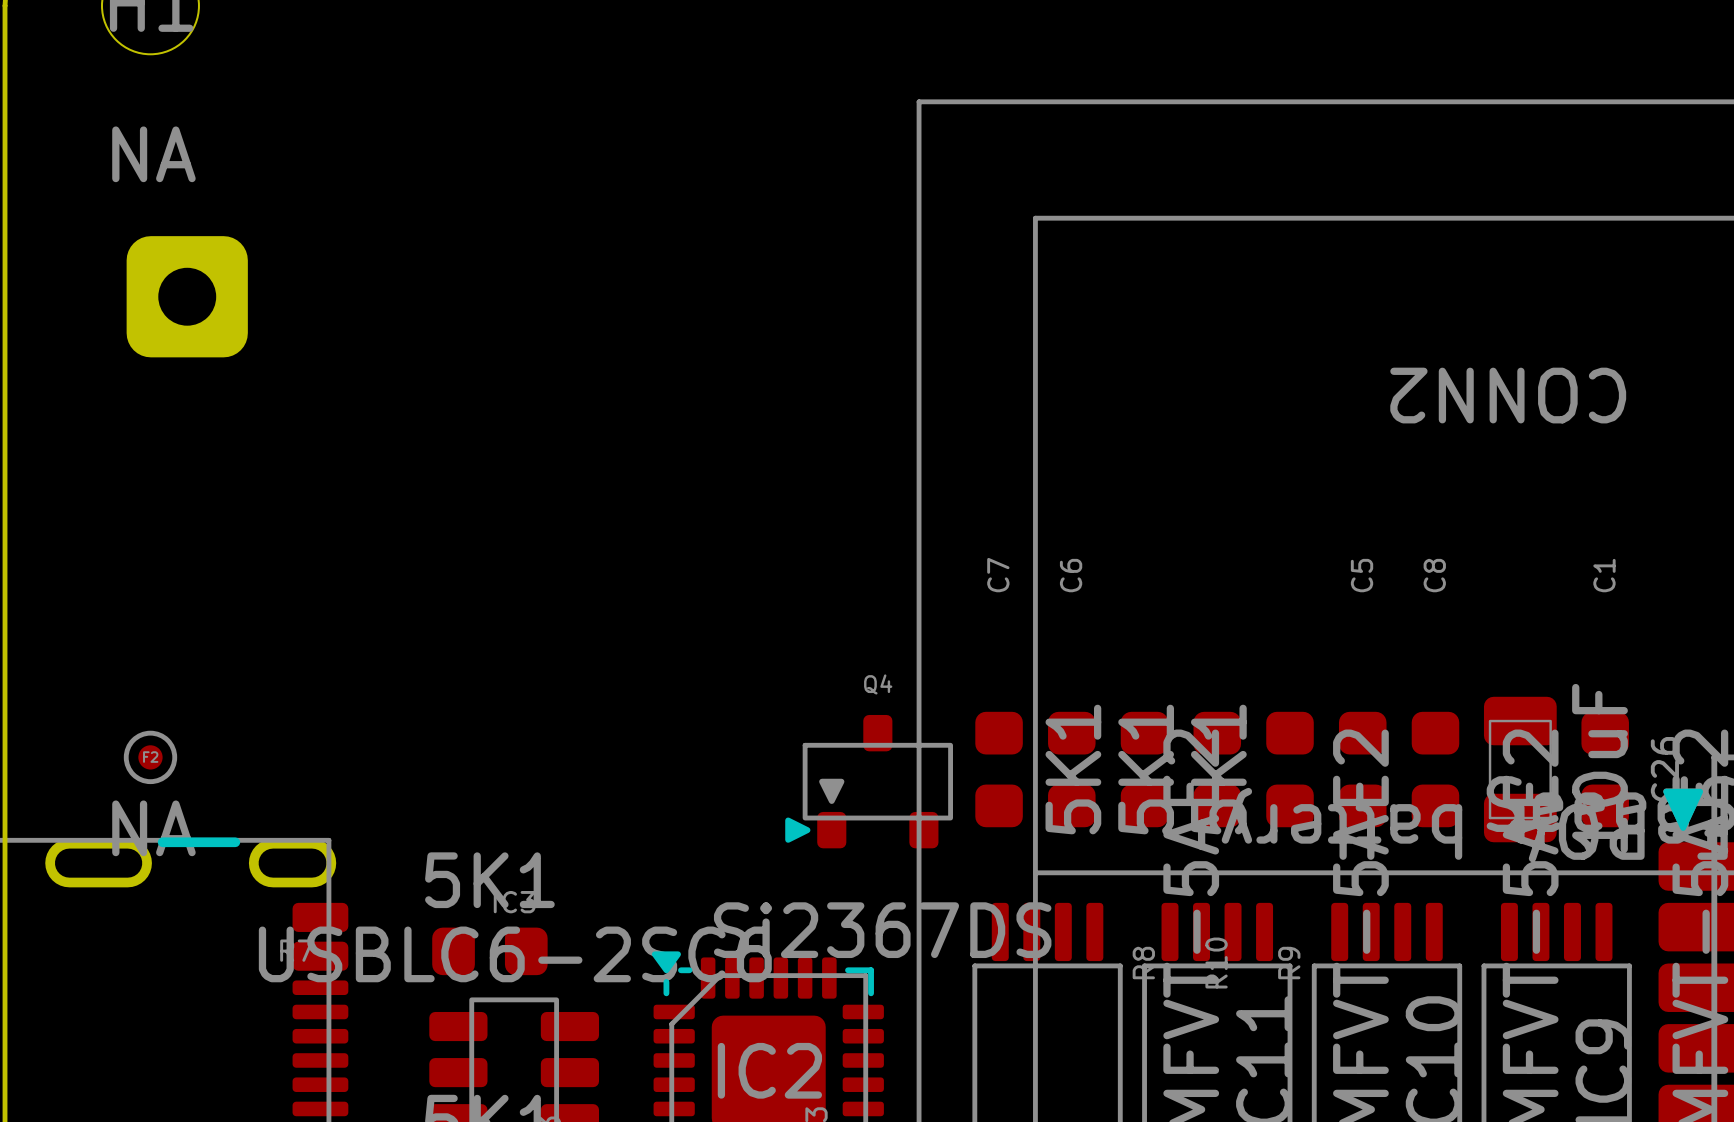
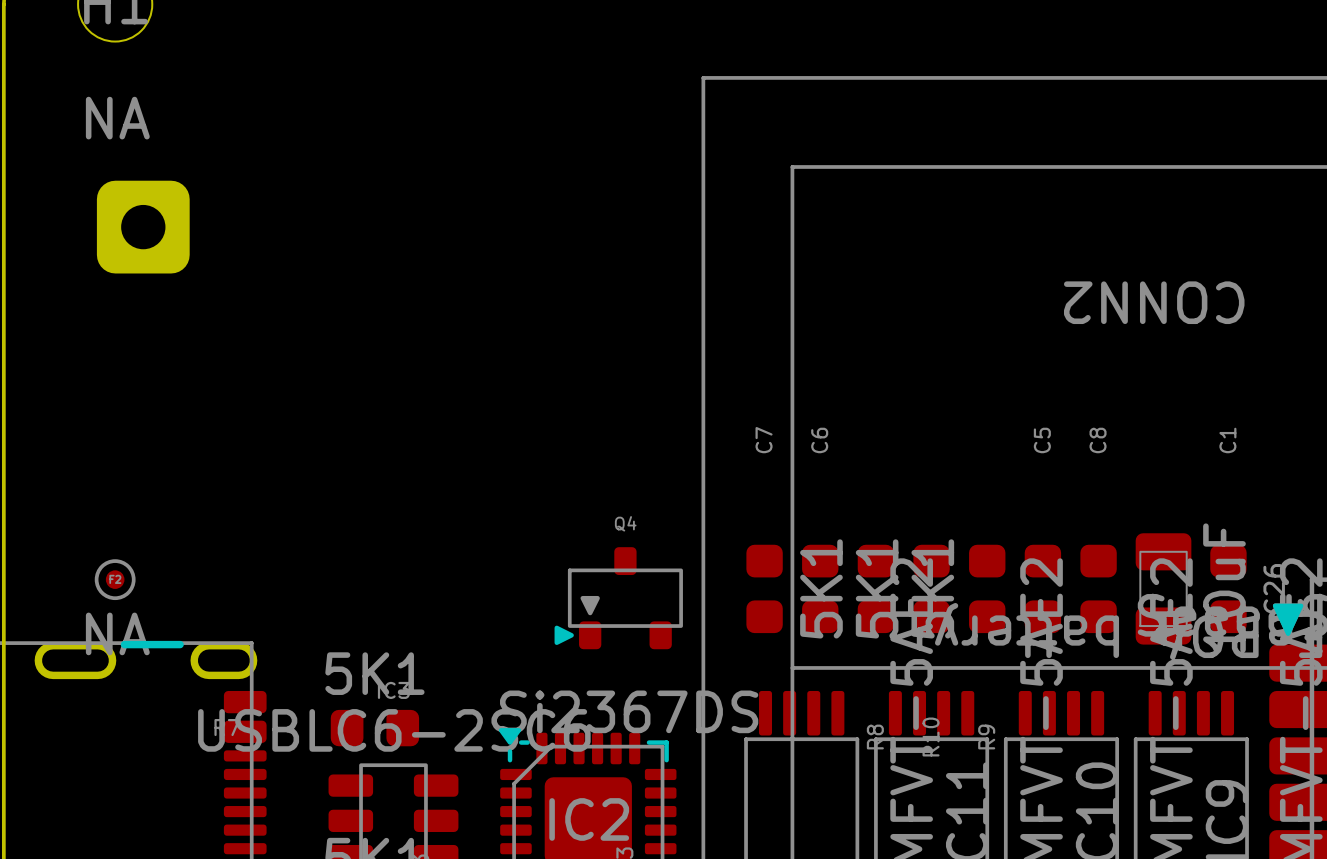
Q4 position: (869, 781) -> (618, 598)

